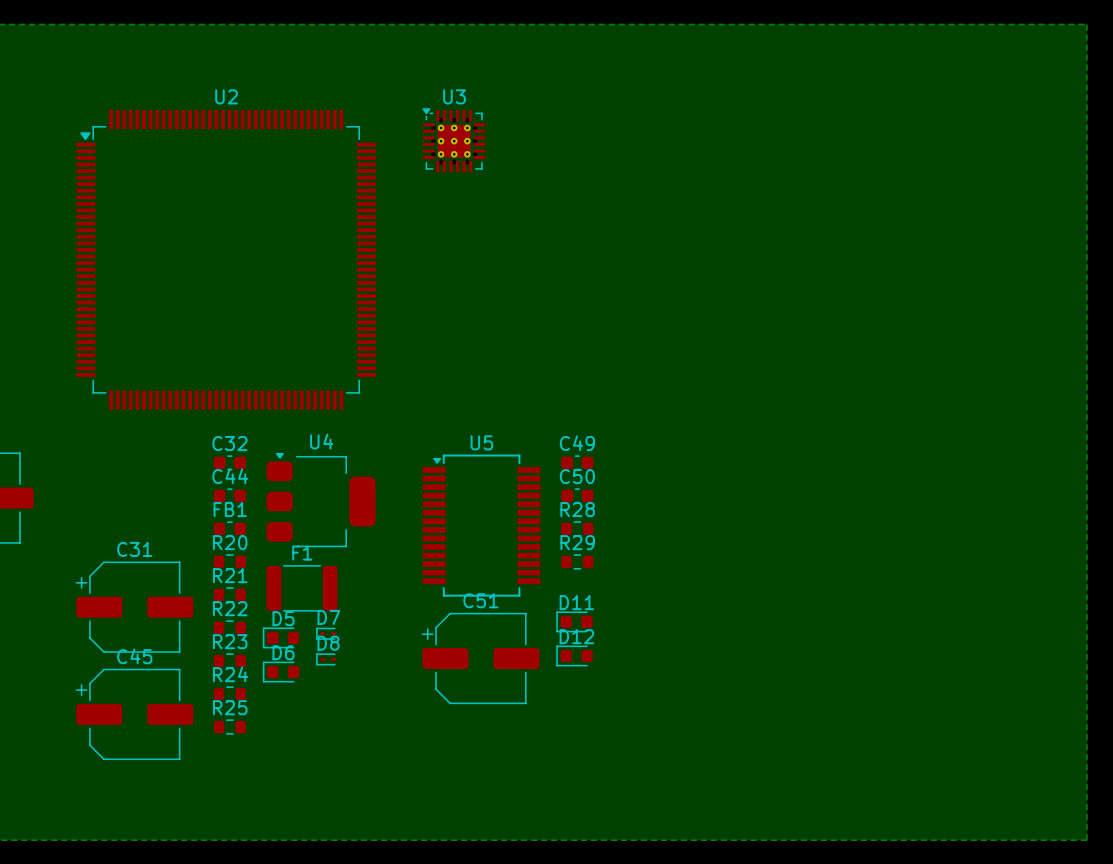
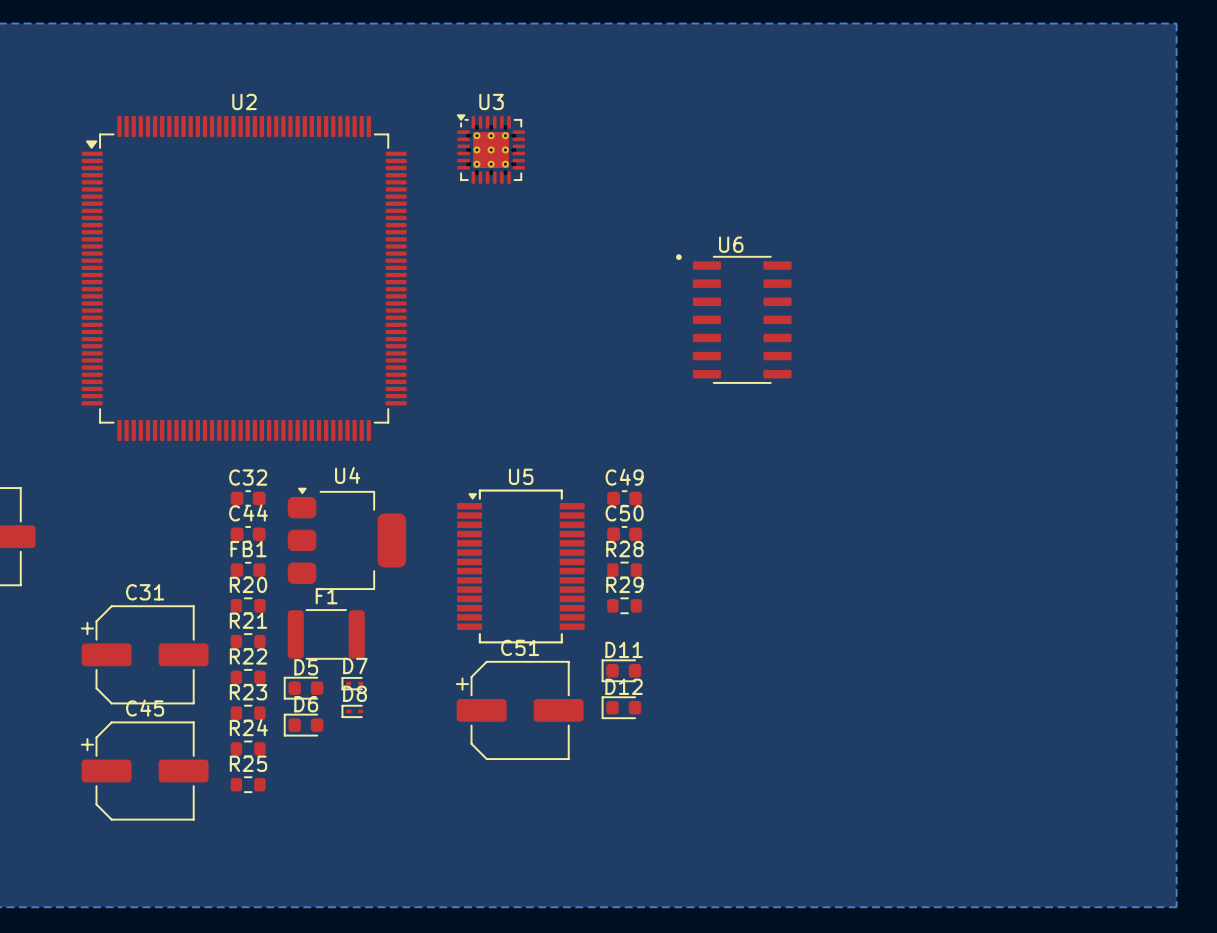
U6: none -> (733, 319)

